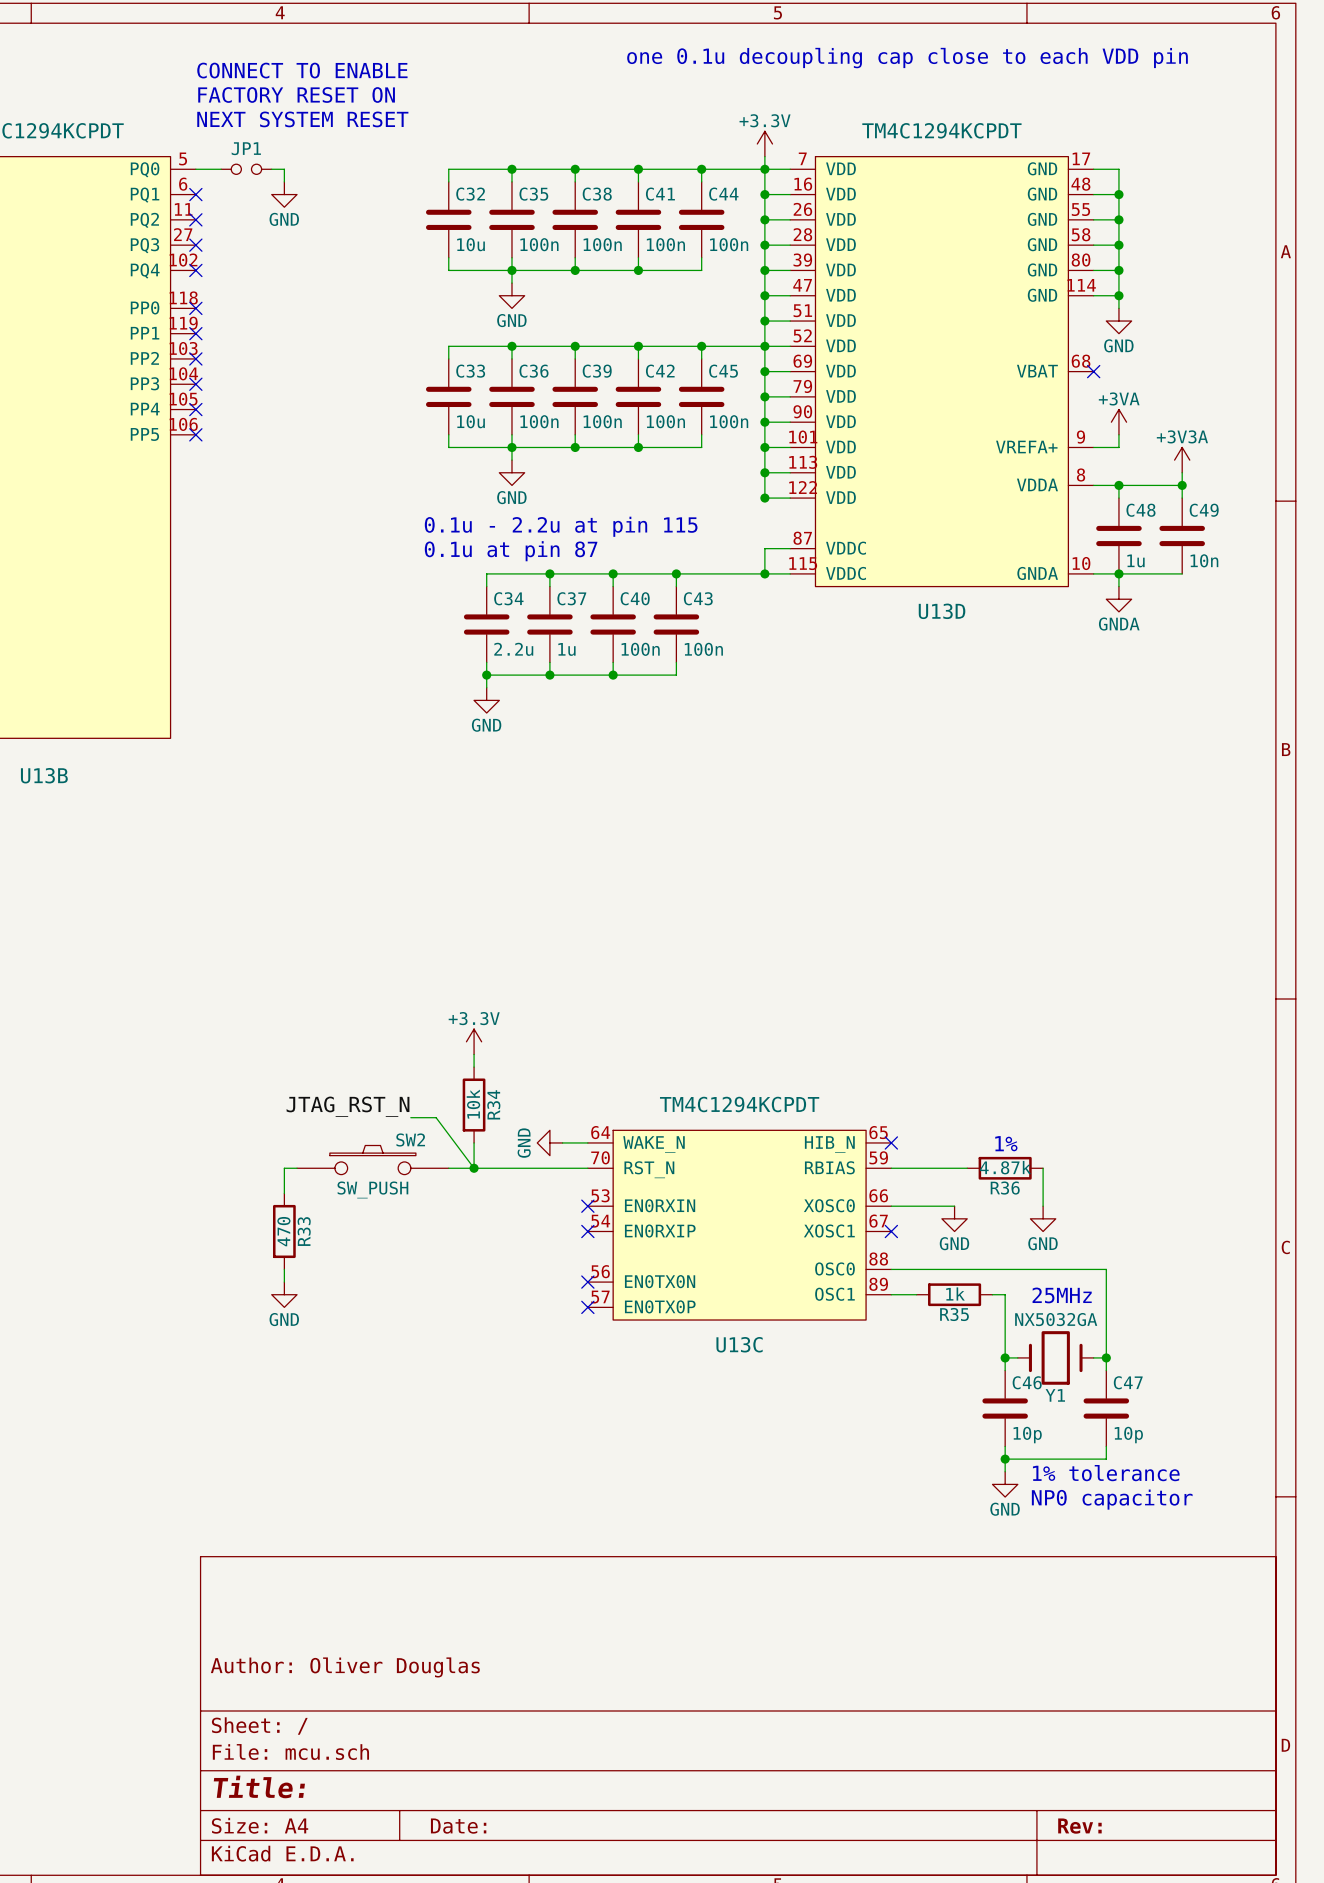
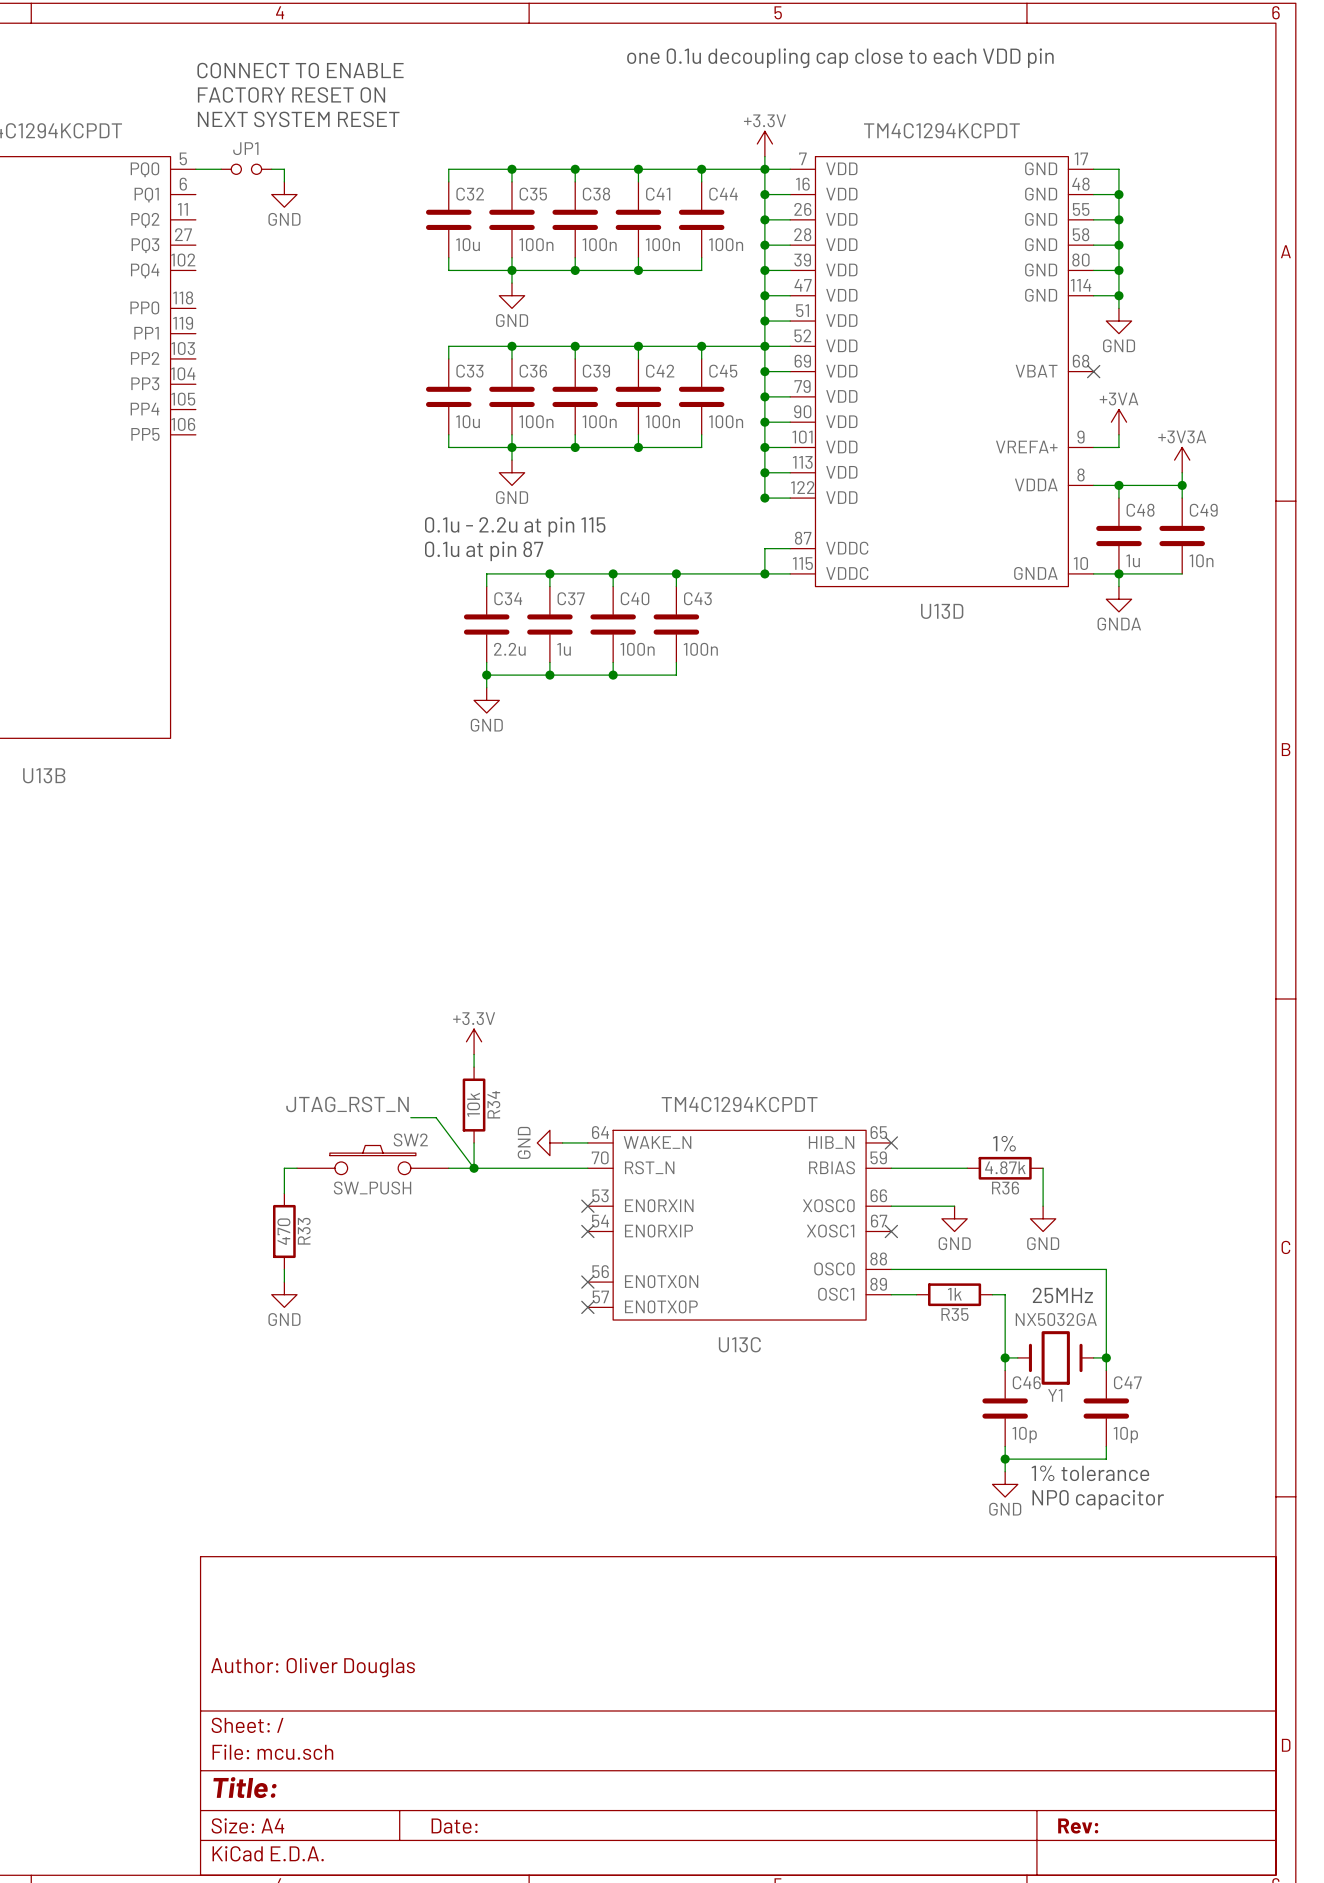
no-connect mark: (195, 194) -> none
no-connect mark: (195, 219) -> none
no-connect mark: (195, 245) -> none
no-connect mark: (195, 270) -> none
no-connect mark: (195, 308) -> none
no-connect mark: (195, 333) -> none
no-connect mark: (195, 358) -> none
no-connect mark: (195, 384) -> none
no-connect mark: (195, 409) -> none
no-connect mark: (195, 434) -> none

